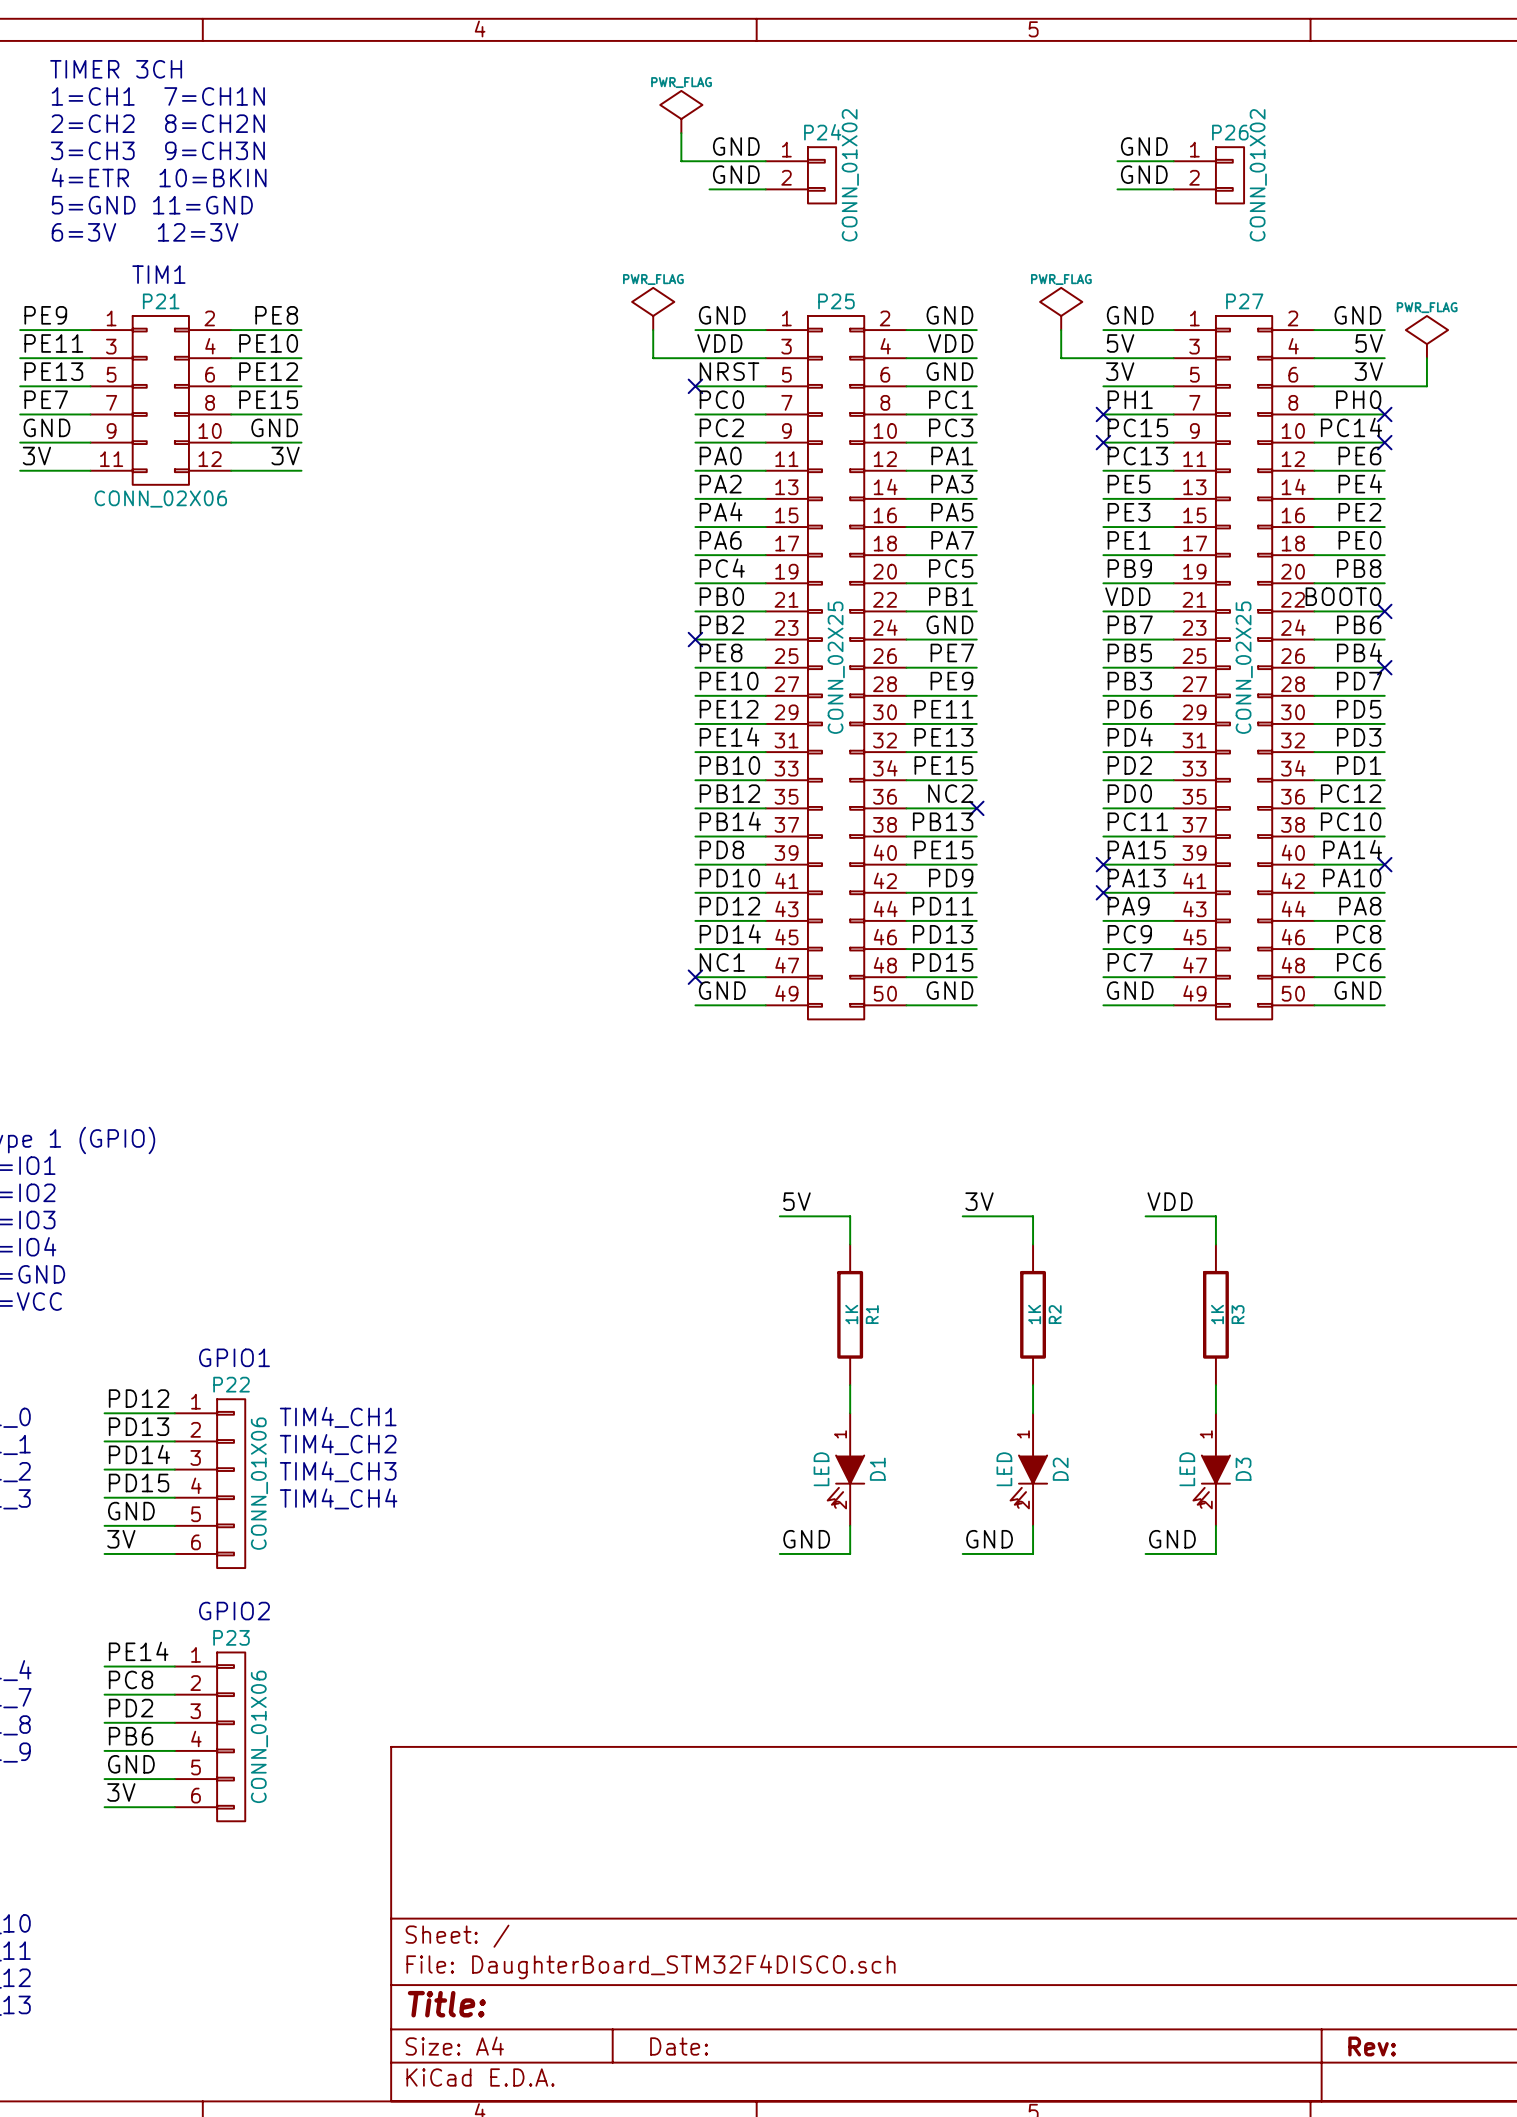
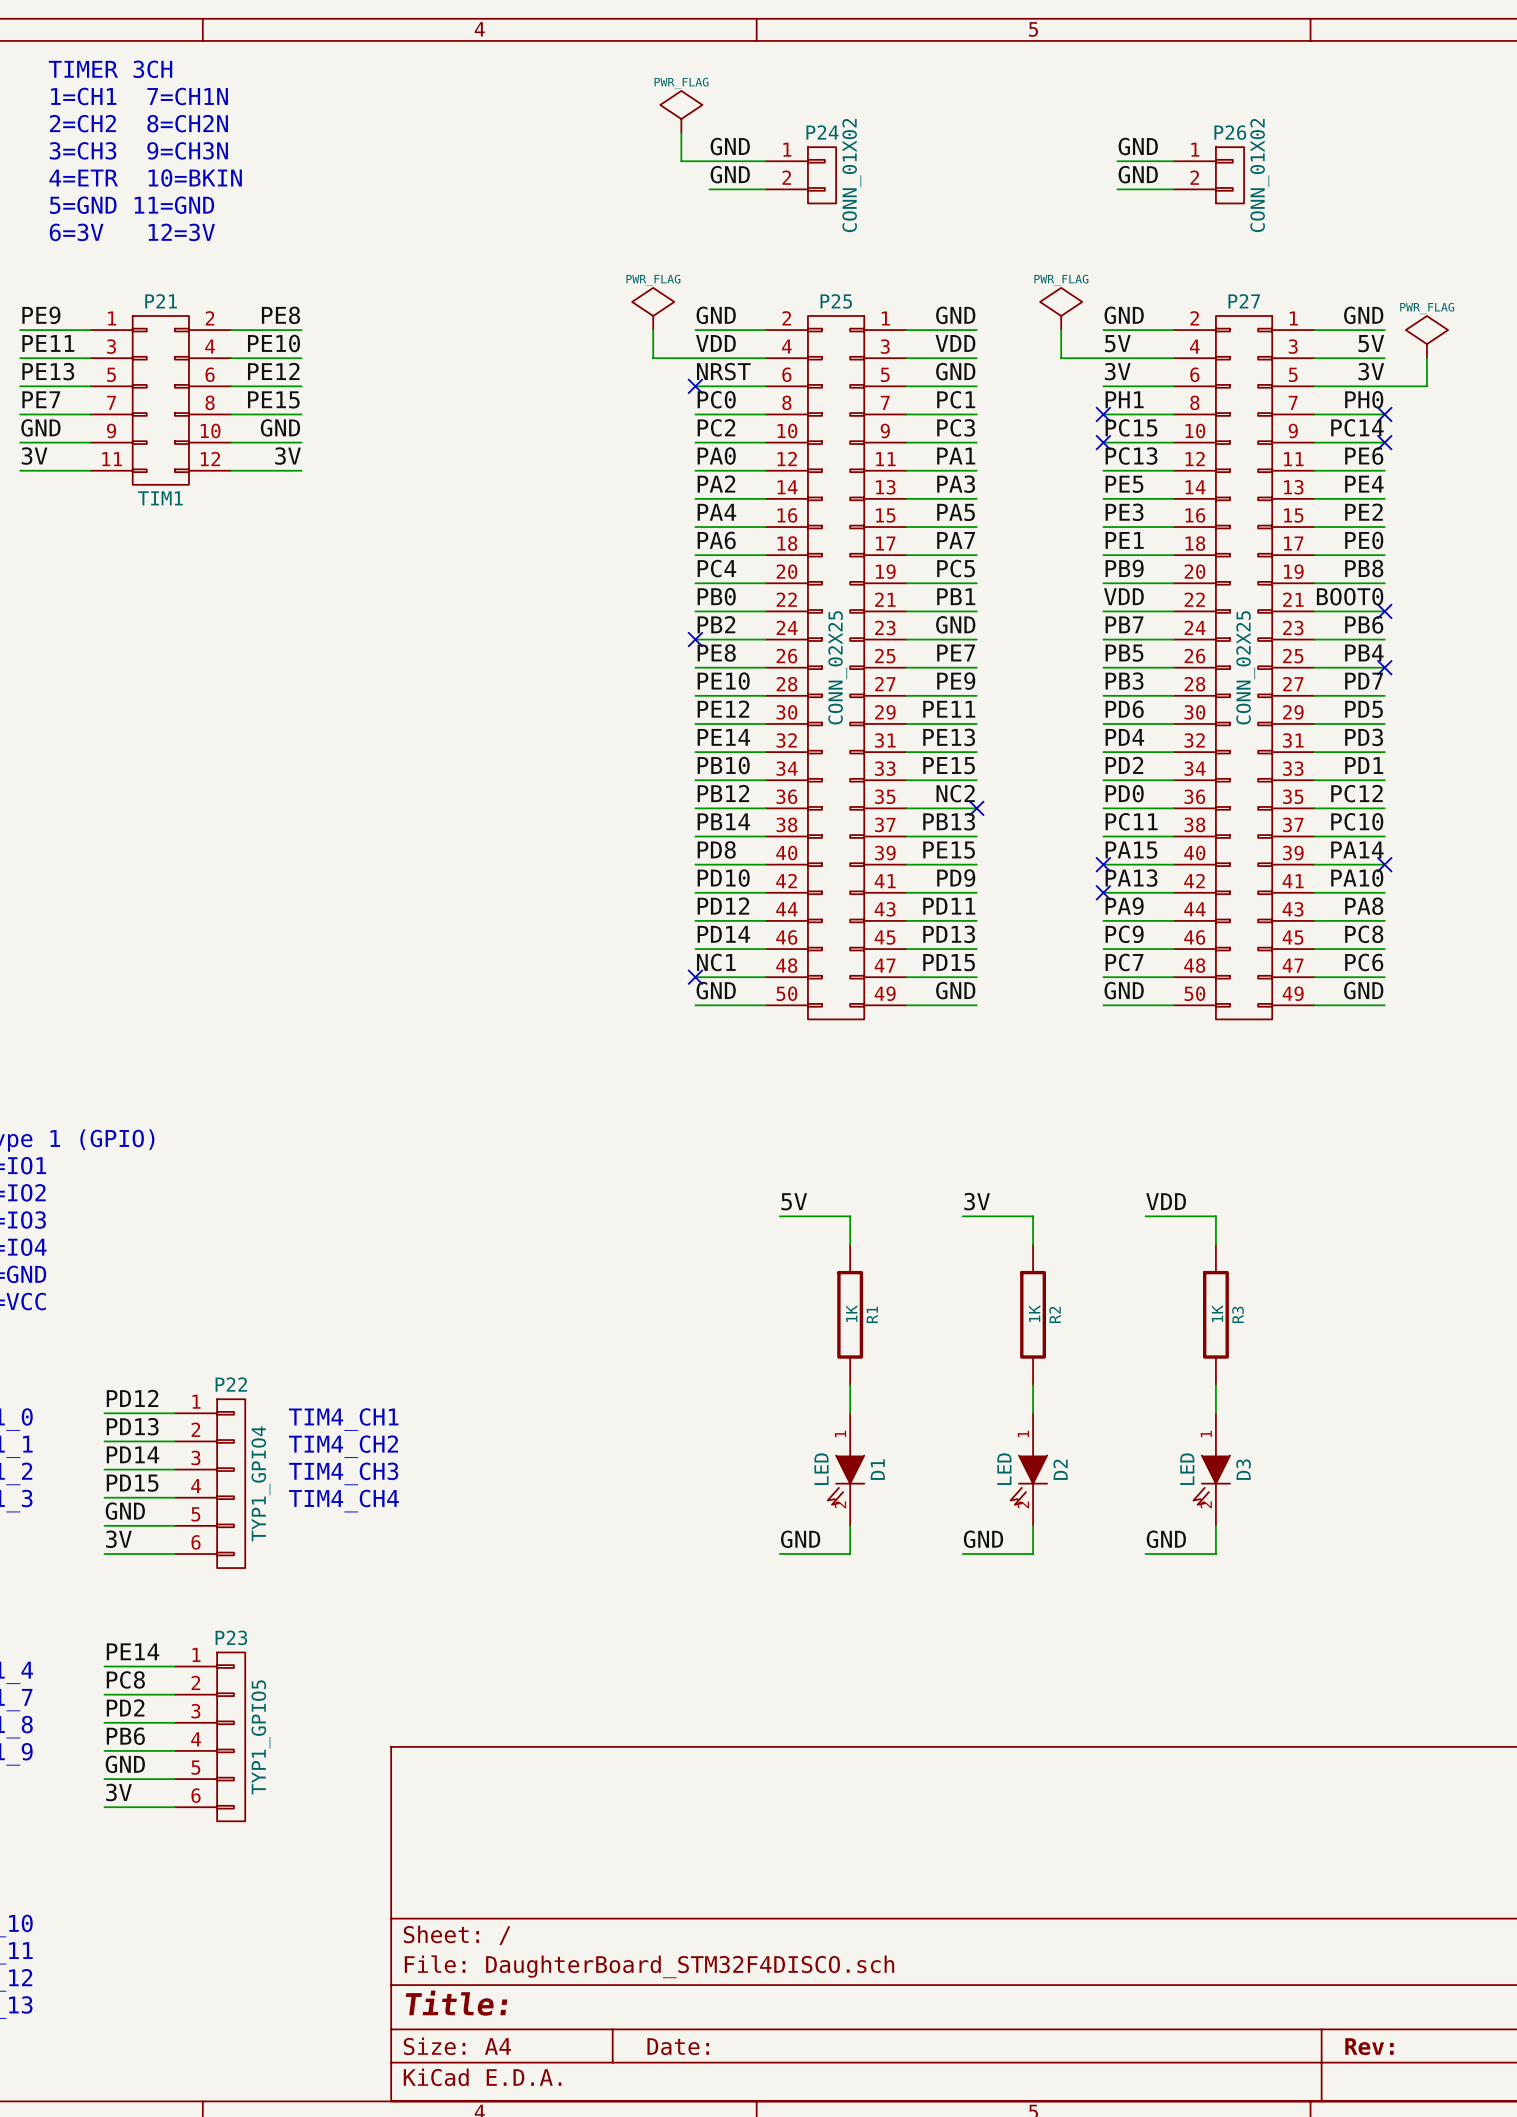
text: TIM1 (158, 274) -> none
P21 value: CONN_02X06 (160, 499) -> TIM1 (160, 498)
P25 flip: as is (836, 667) -> left-right (836, 667)
P27 flip: as is (1244, 667) -> left-right (1244, 667)
text: GPIO1 (234, 1357) -> none
P22 value: CONN_01X06 (259, 1483) -> TYP1_GPIO4 (260, 1483)
text: GPIO2 (234, 1611) -> none
P23 value: CONN_01X06 (259, 1736) -> TYP1_GPIO5 (260, 1737)

